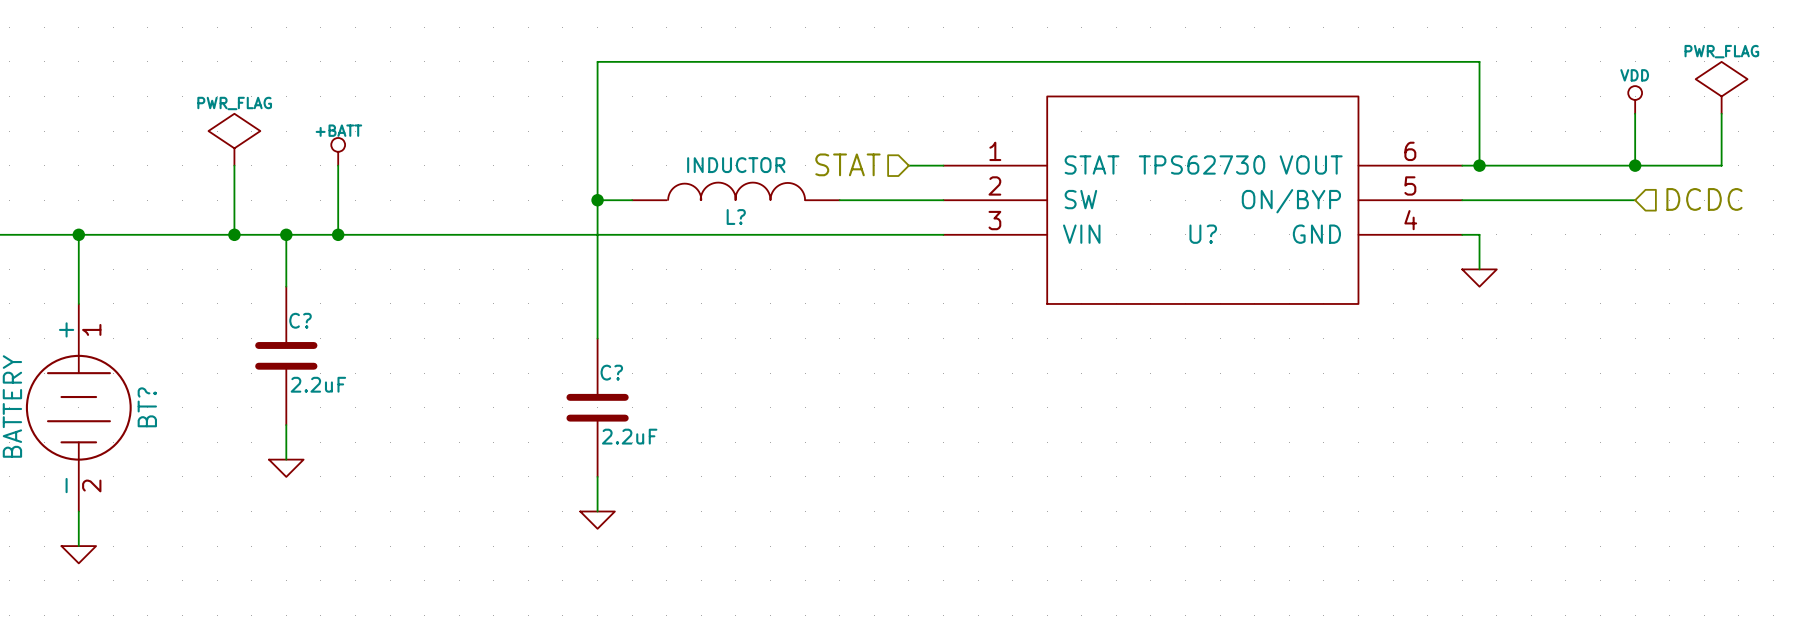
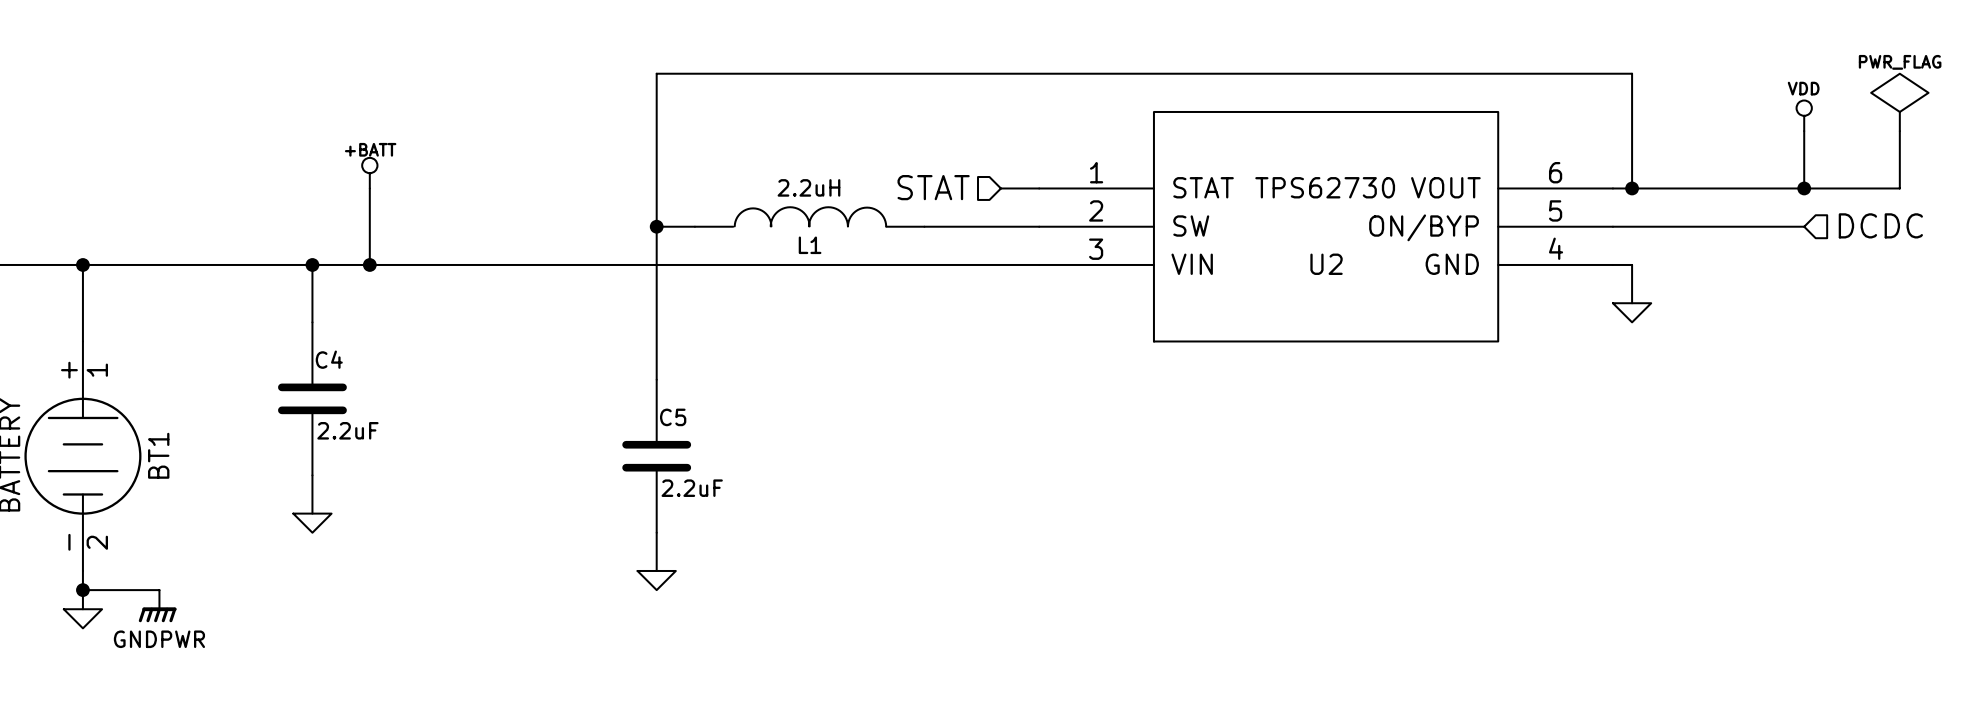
power symbol: PWR_FLAG (234, 139) -> none
wire: (234, 165) (234, 234) -> none
L? value: INDUCTOR (736, 165) -> 2.2uH (808, 187)
L? name: L? (736, 217) -> L1 (810, 245)
junction: (234, 234) -> none
U? name: U? (1203, 234) -> U2 (1326, 264)
C? name: C? (300, 320) -> C4 (329, 359)
C? name: C? (611, 372) -> C5 (673, 417)
BT? name: BT? (147, 407) -> BT1 (158, 455)
wire: none -> (82, 590) (159, 590) (159, 609)
junction: none -> (82, 590)
power symbol: none -> GNDPWR (157, 614)

